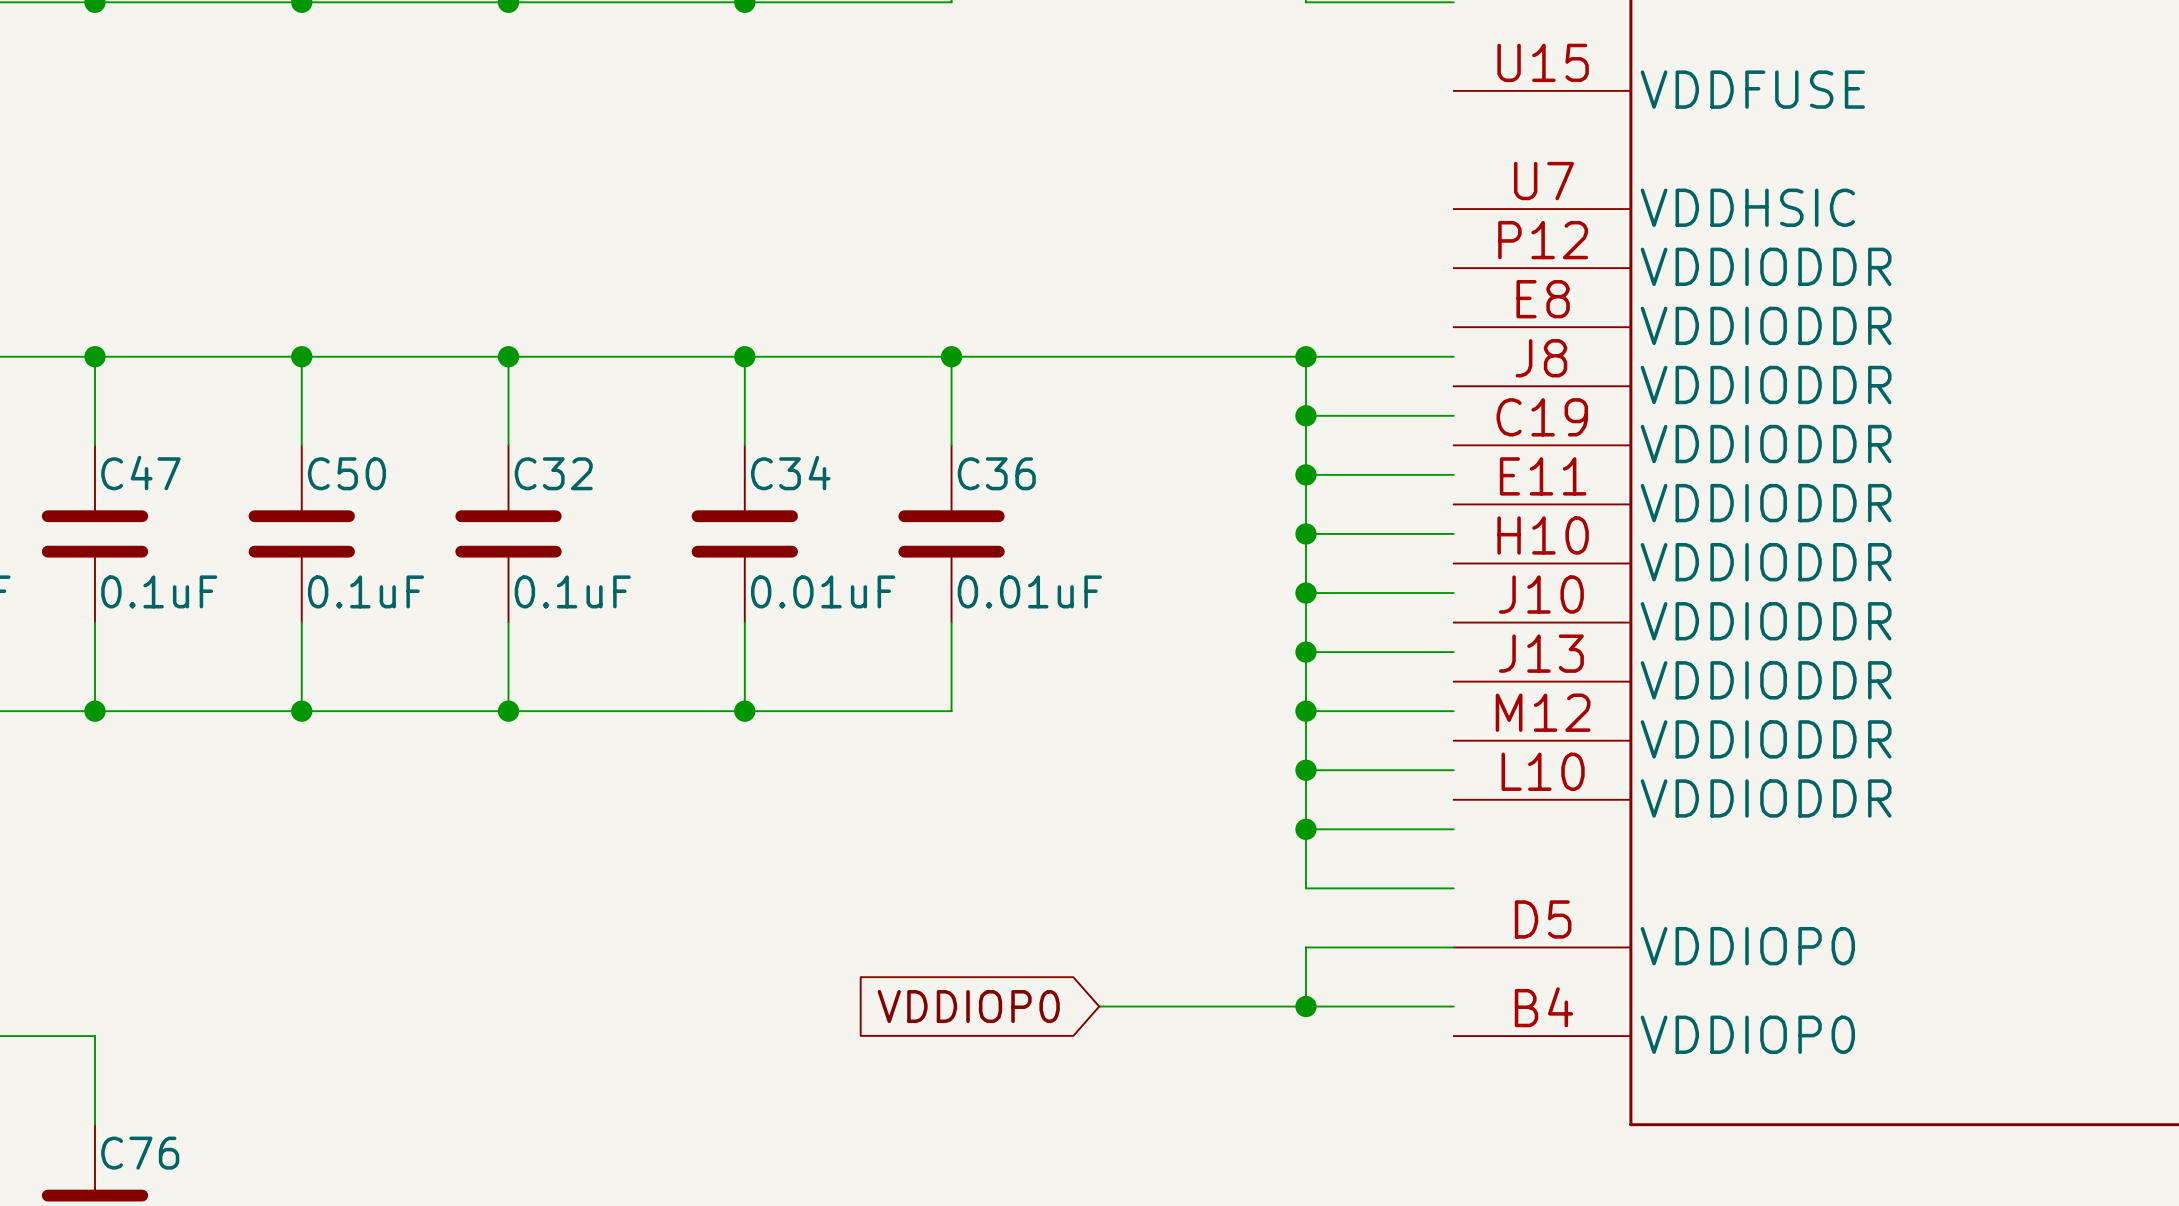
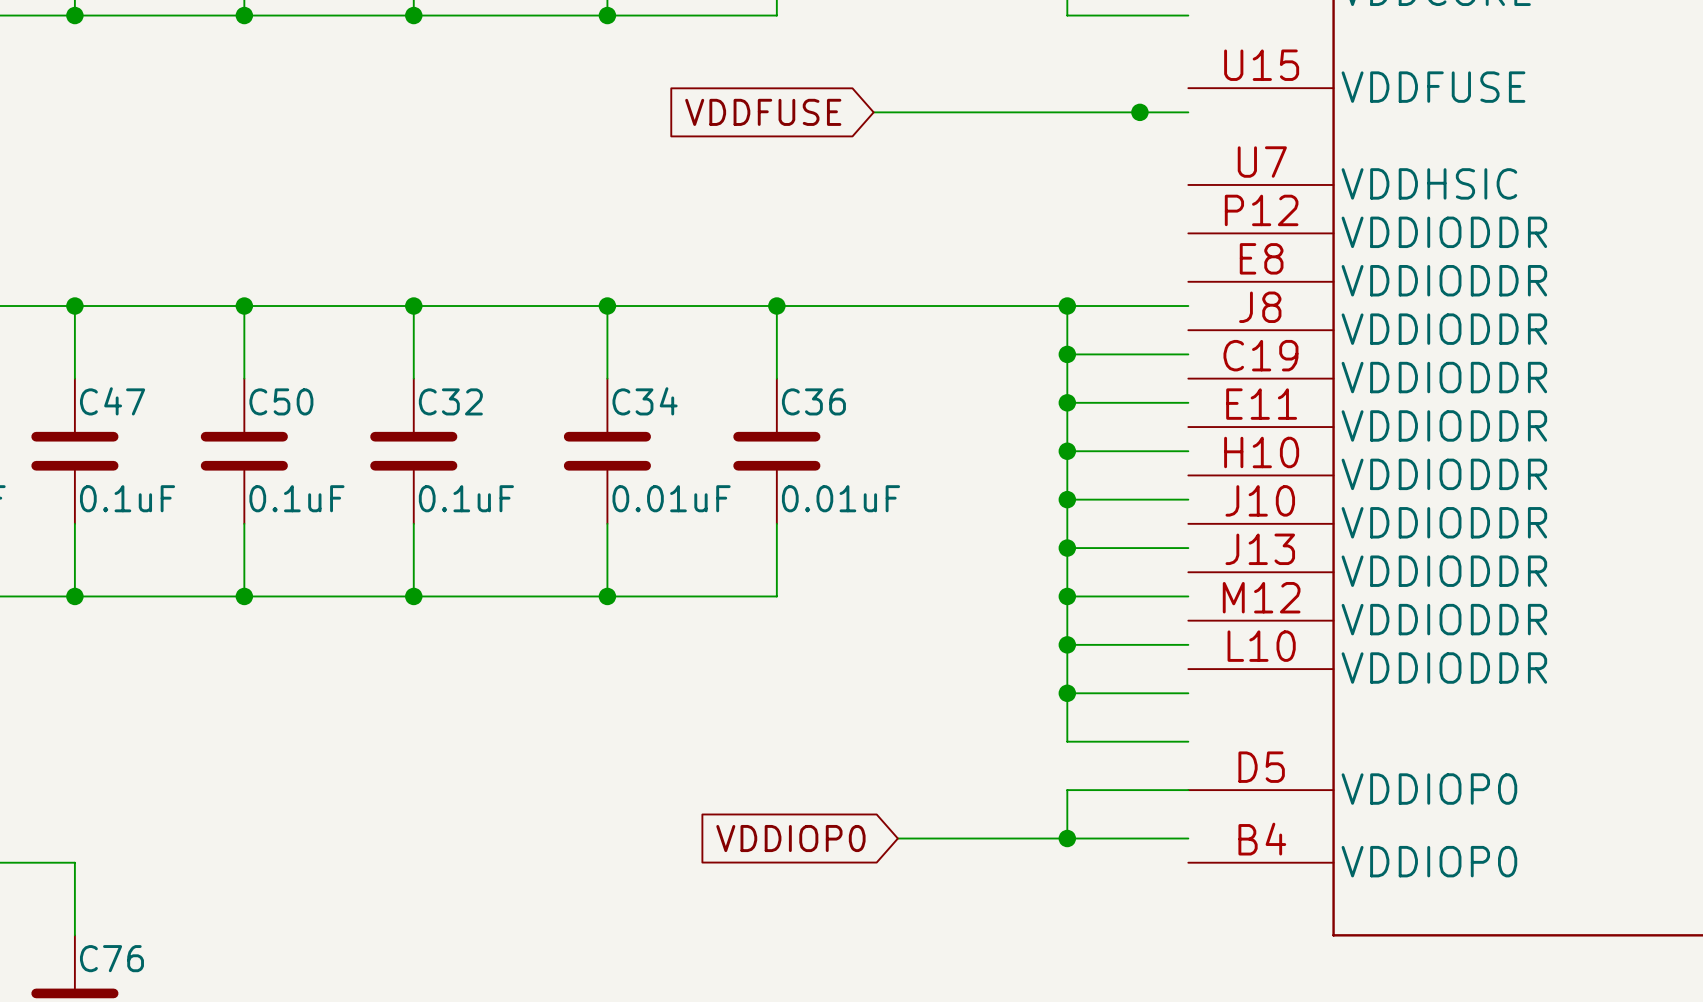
global label: none -> VDDFUSE (763, 112)
wire: none -> (873, 112) (1188, 112)
junction: none -> (1139, 112)

